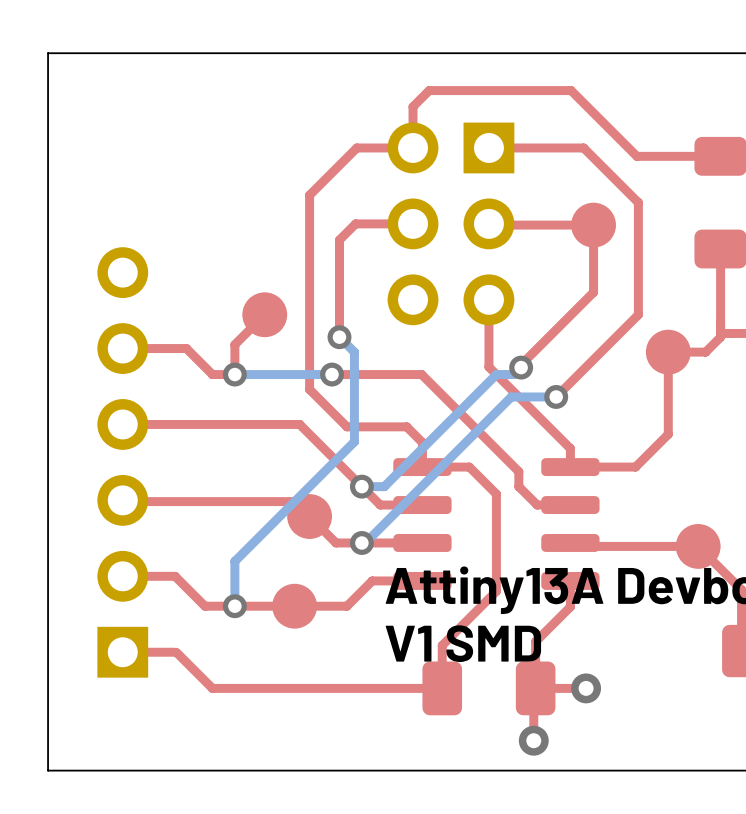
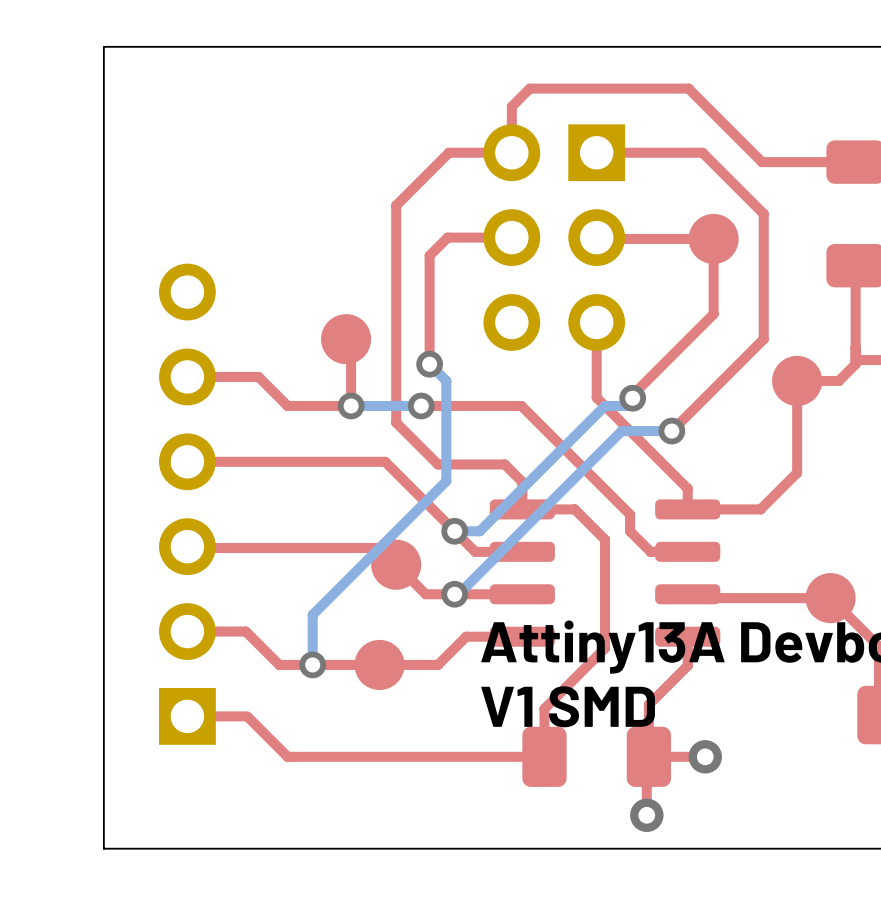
top track: (264, 314) (234, 344) (234, 374) -> (346, 339) (351, 344) (351, 406) (312, 406)
via position: (234, 374) -> (351, 406)
bottom track: (269, 374) (234, 374) -> none

